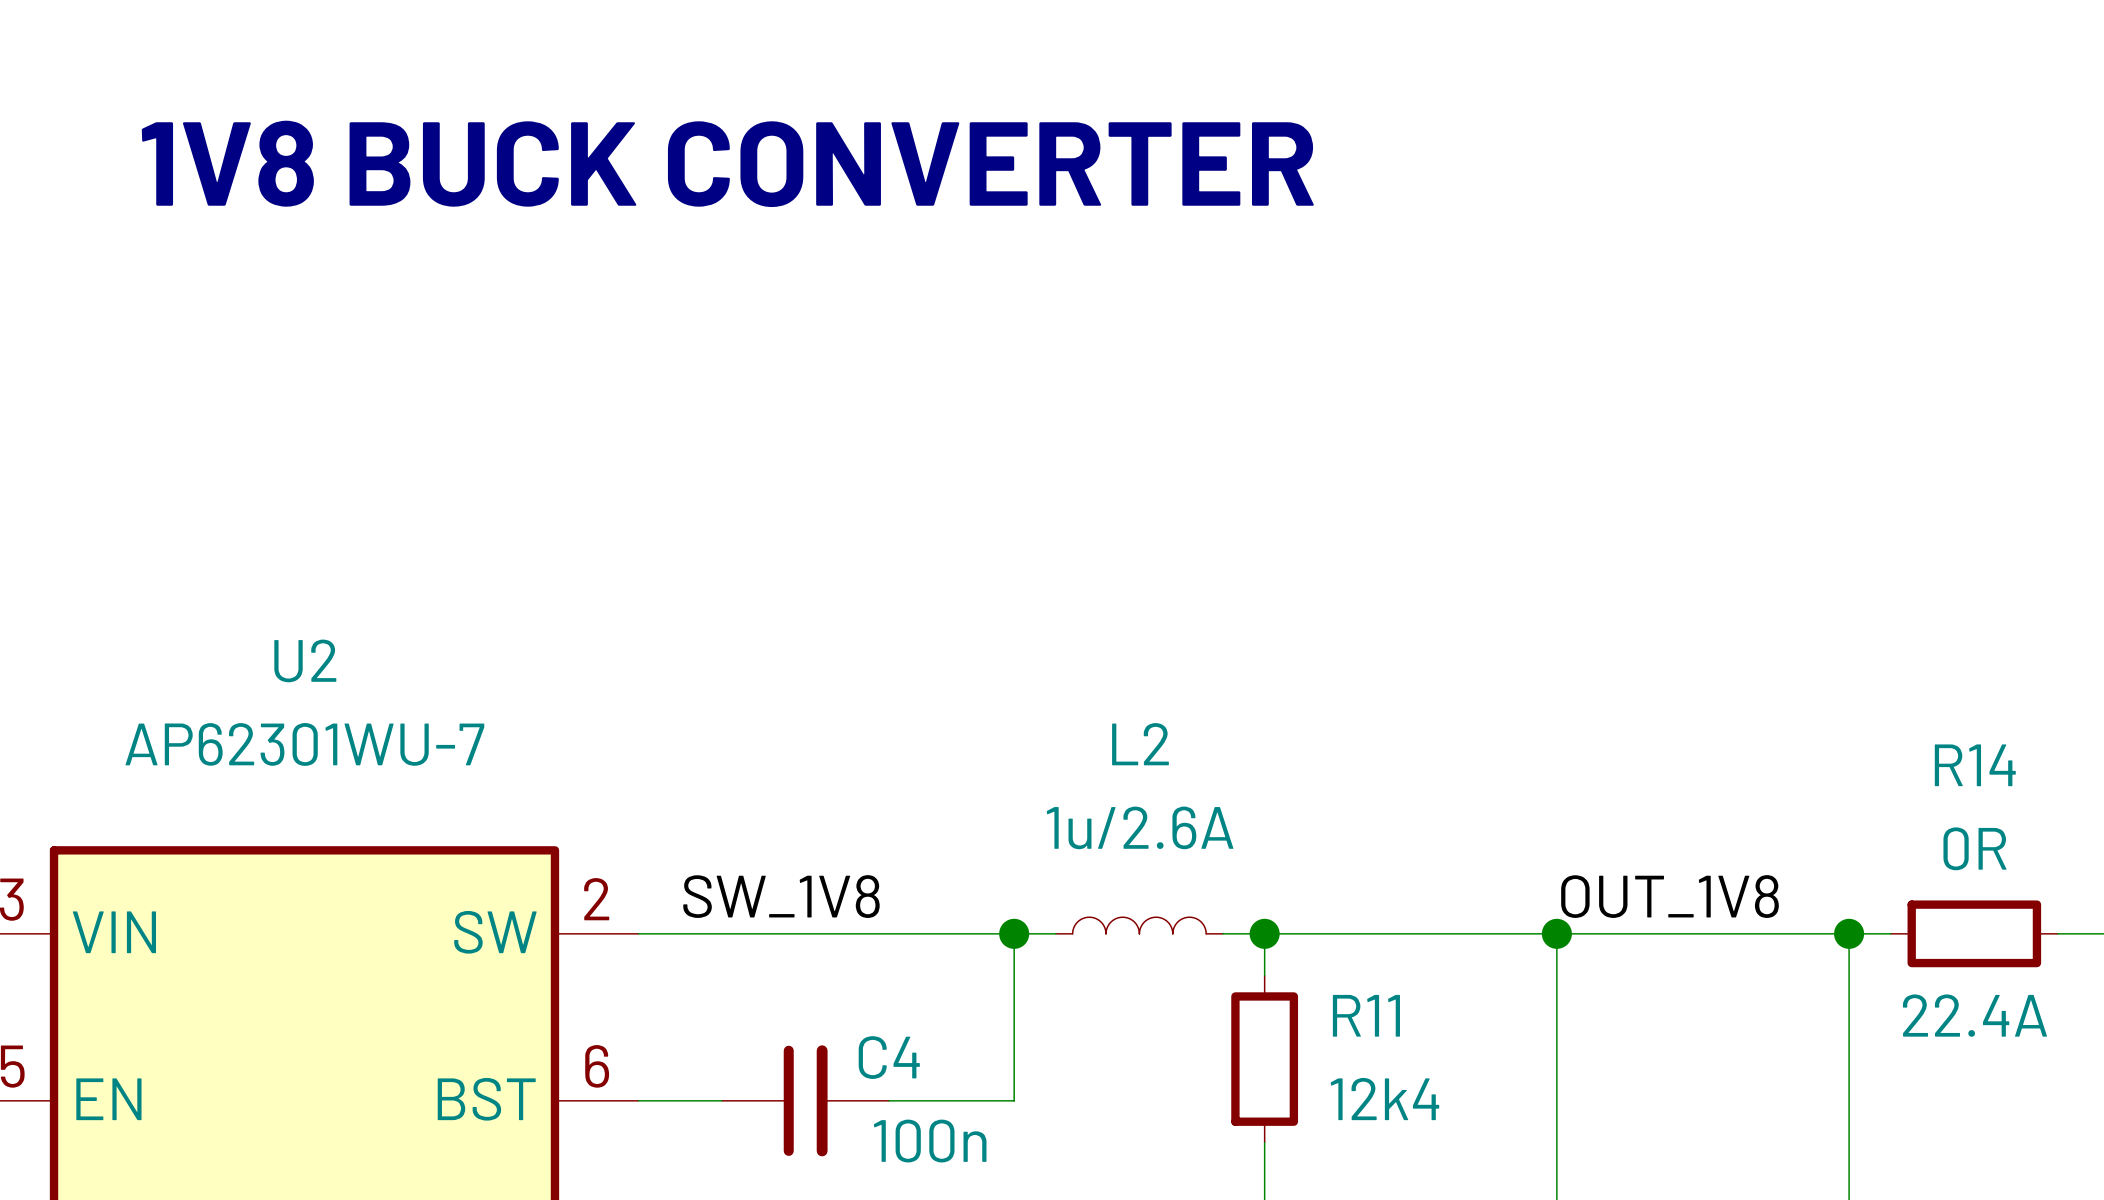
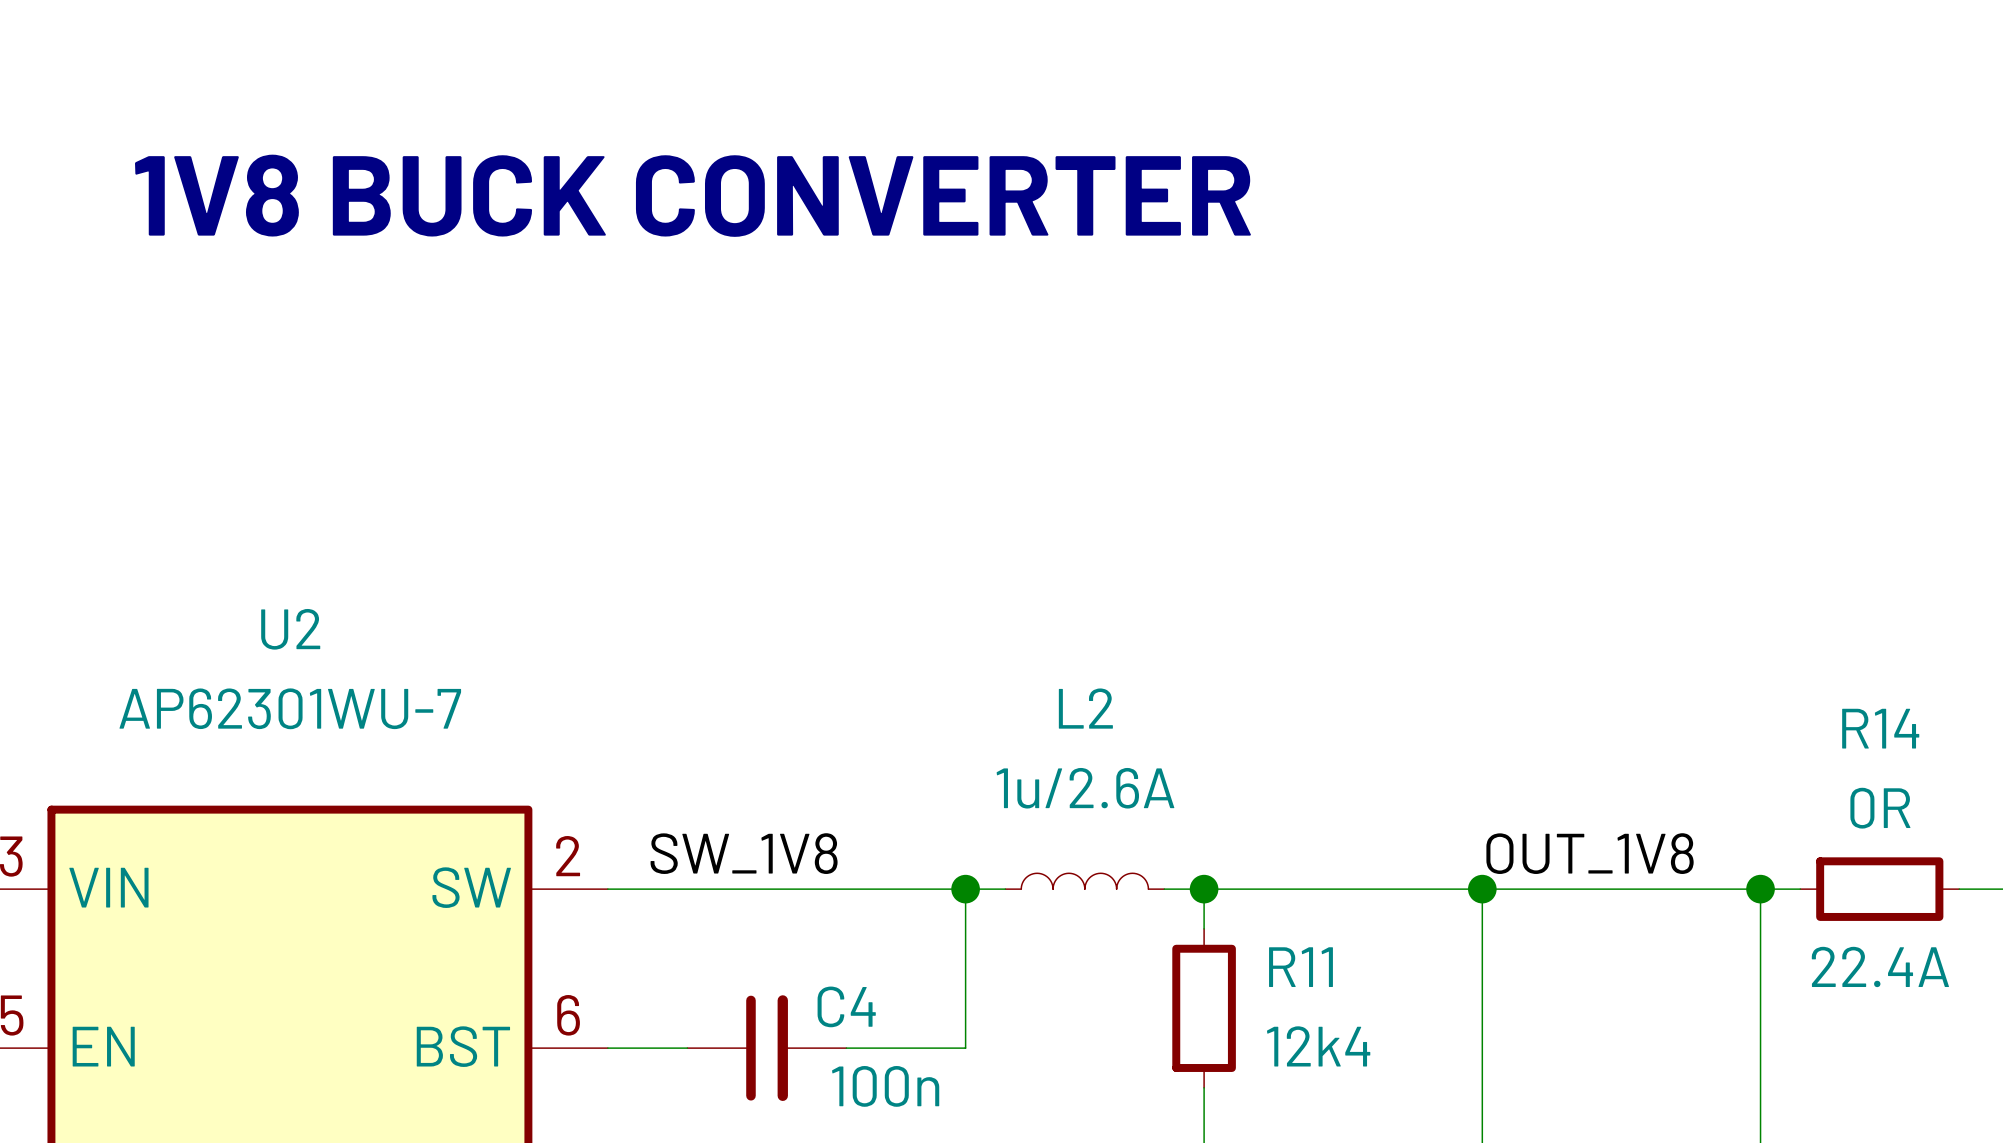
text position: 1V8 BUCK CONVERTER (727, 163) -> 1V8 BUCK CONVERTER (692, 195)

